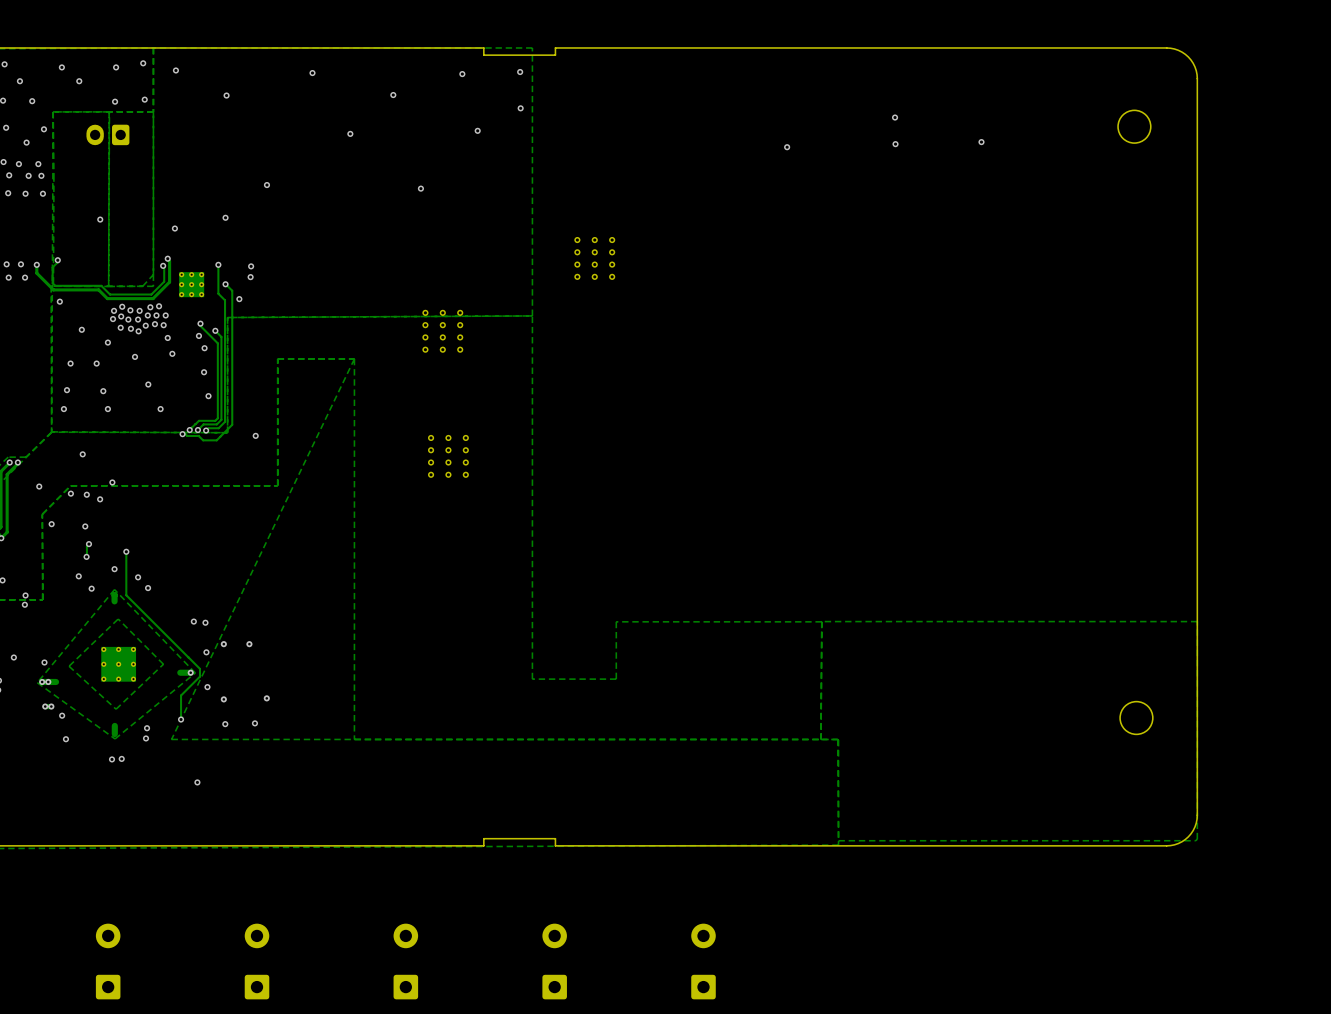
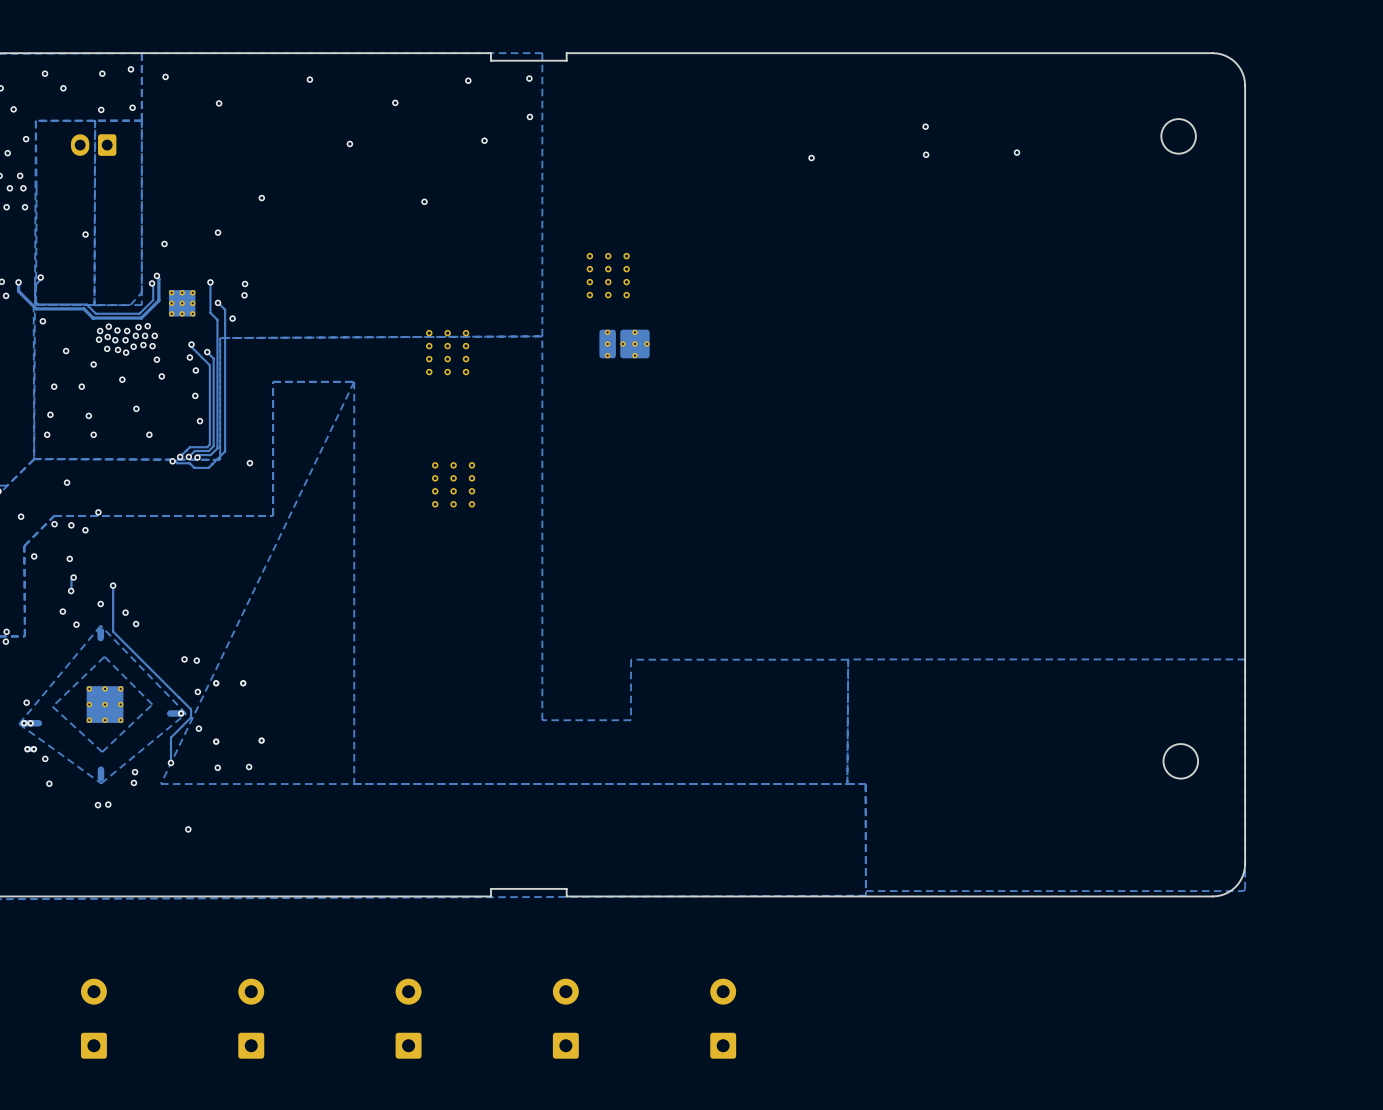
part: none -> (624, 343)

